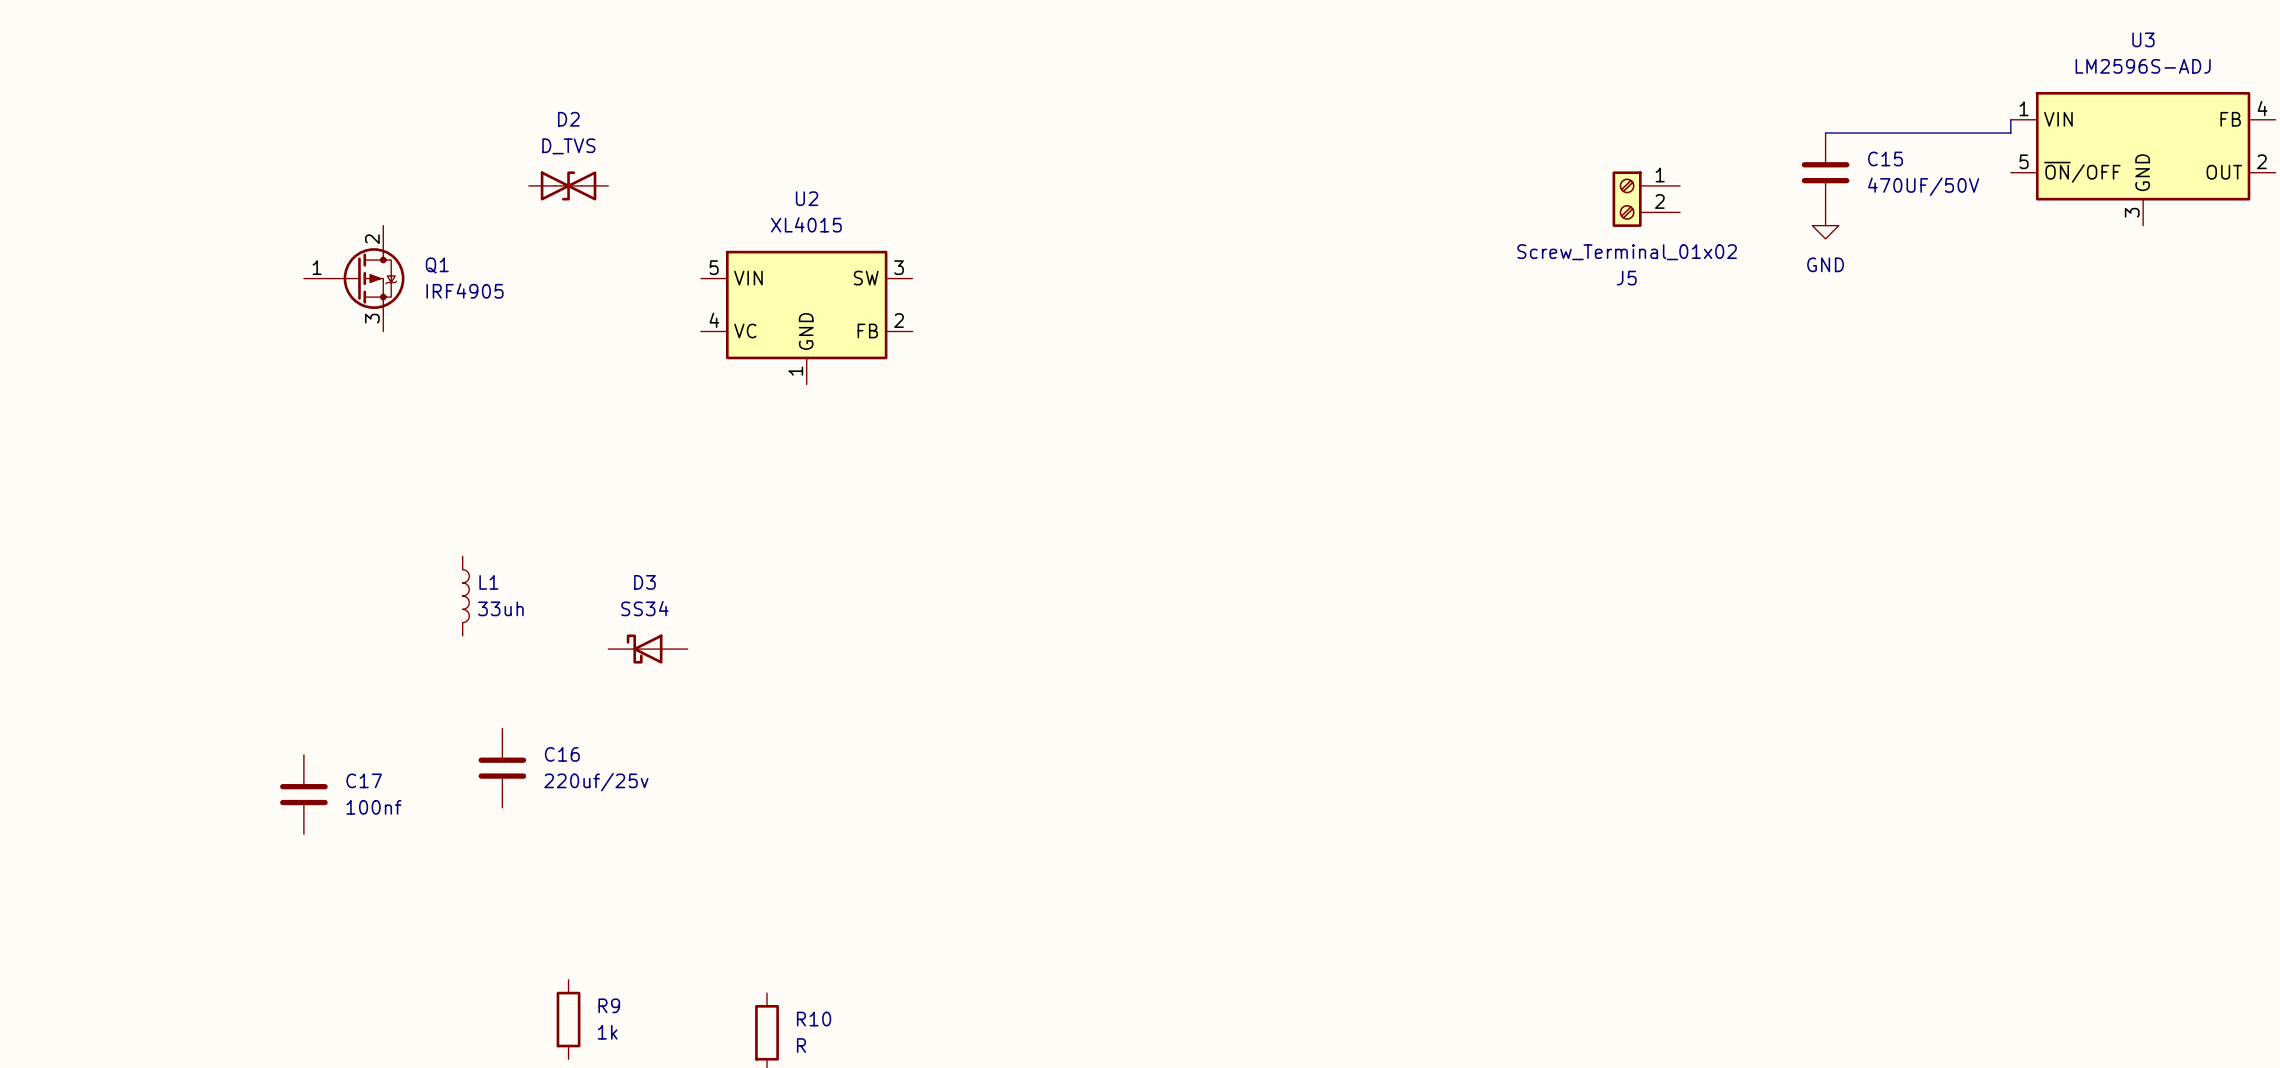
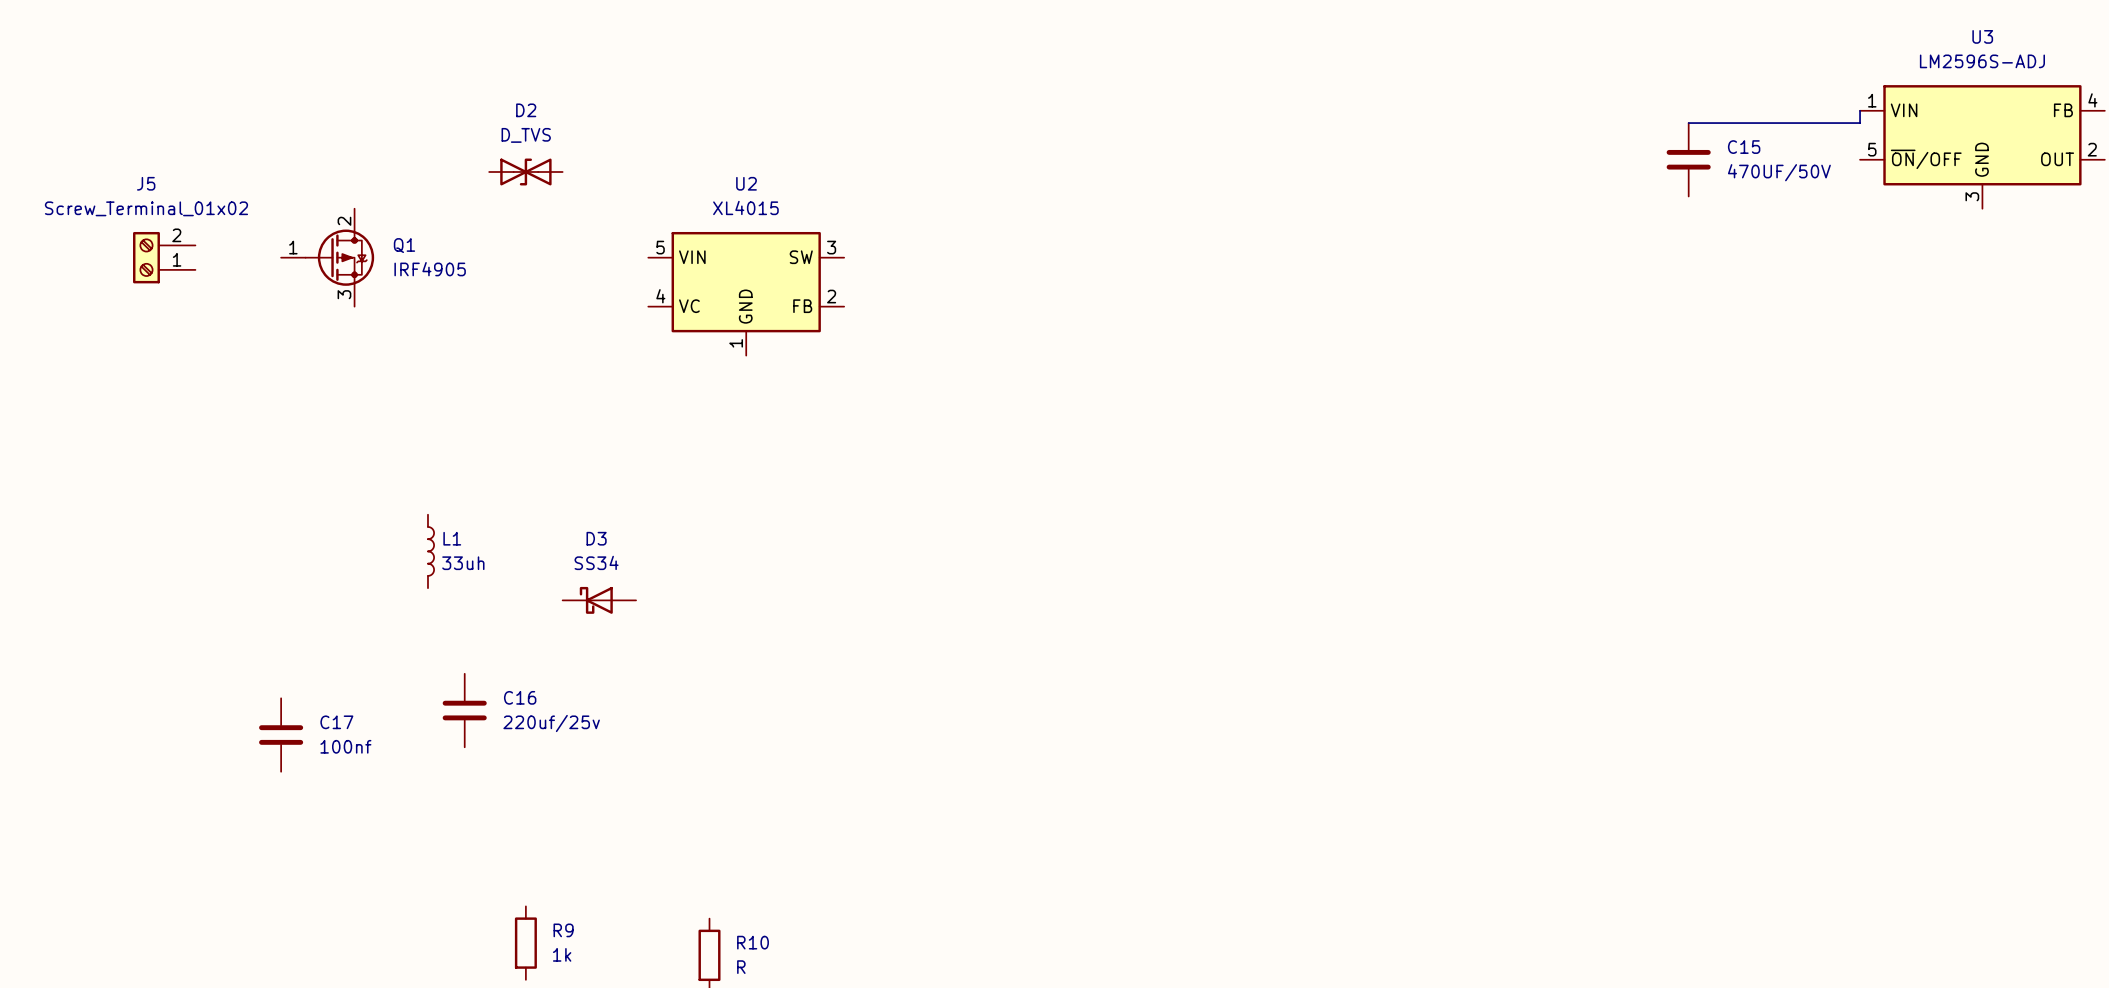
J5 flip: as is (1627, 199) -> up-down (146, 257)
J5 position: (1646, 199) -> (164, 257)
power symbol: GND (1825, 225) -> none

